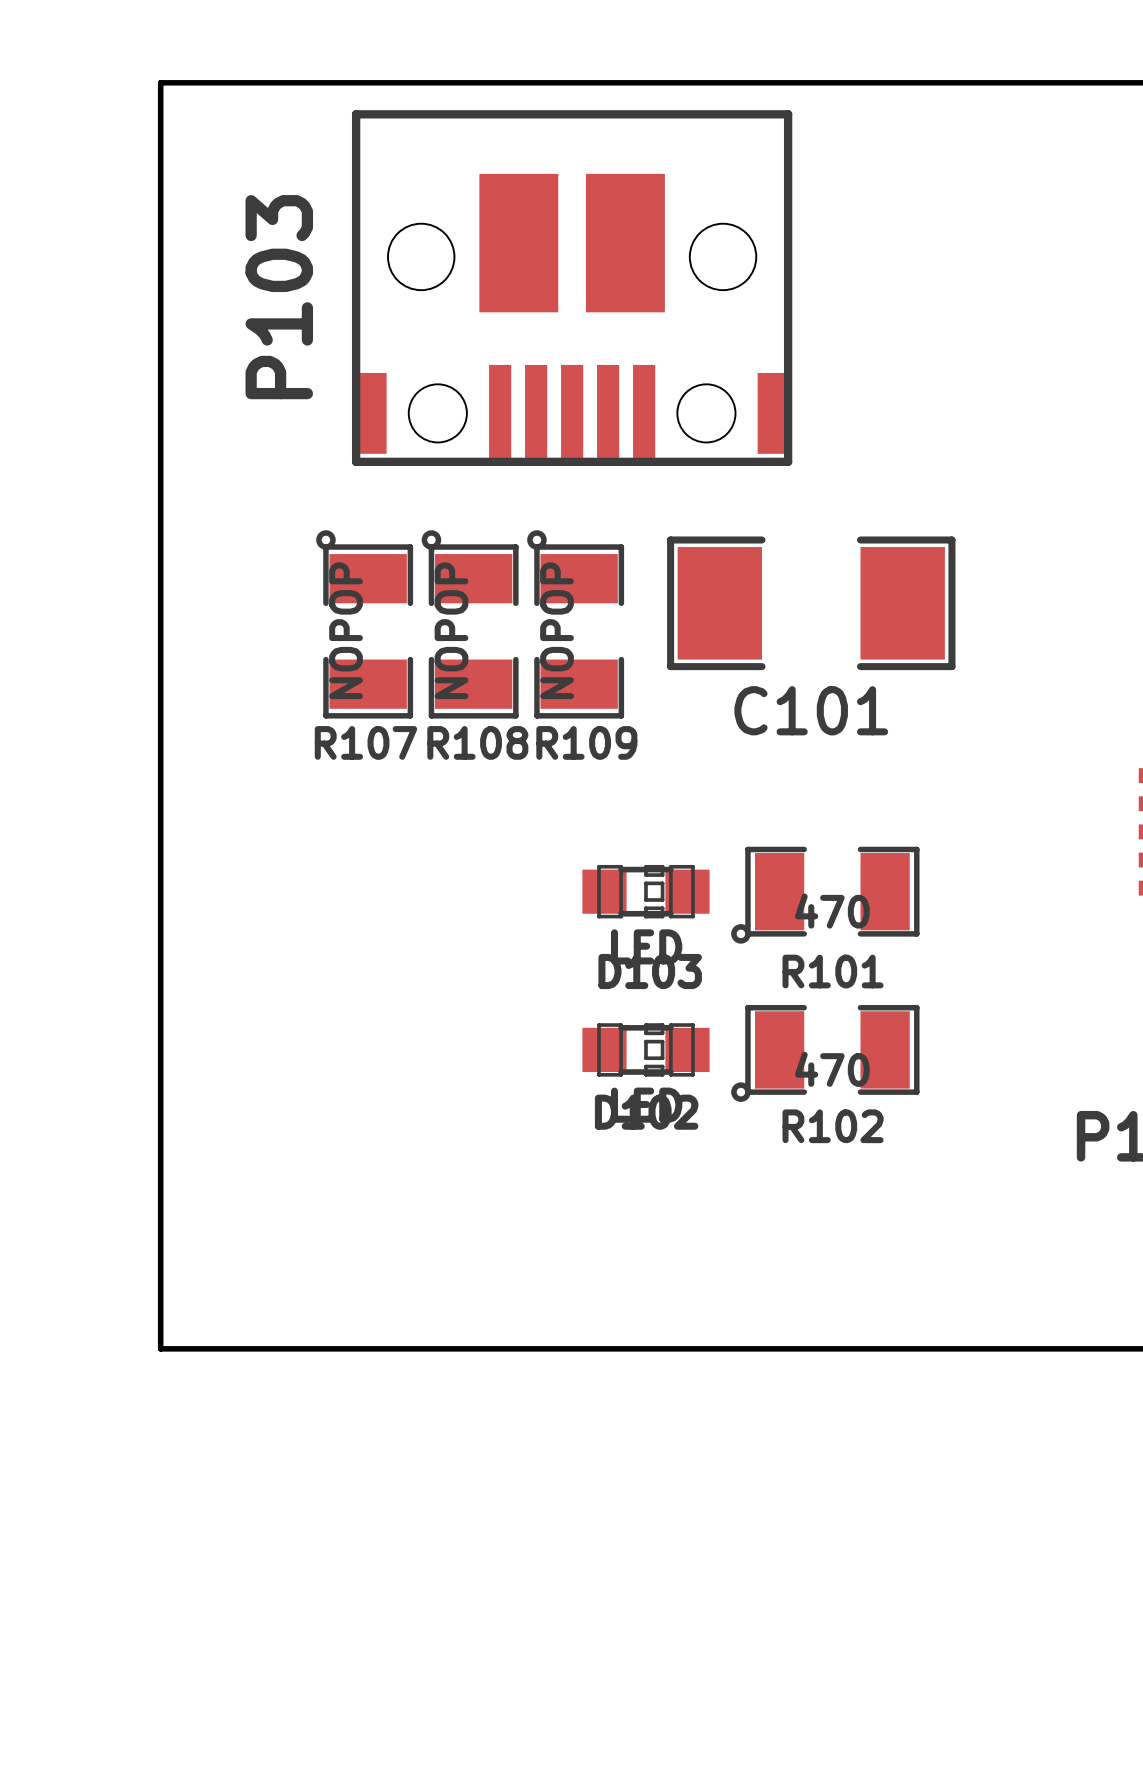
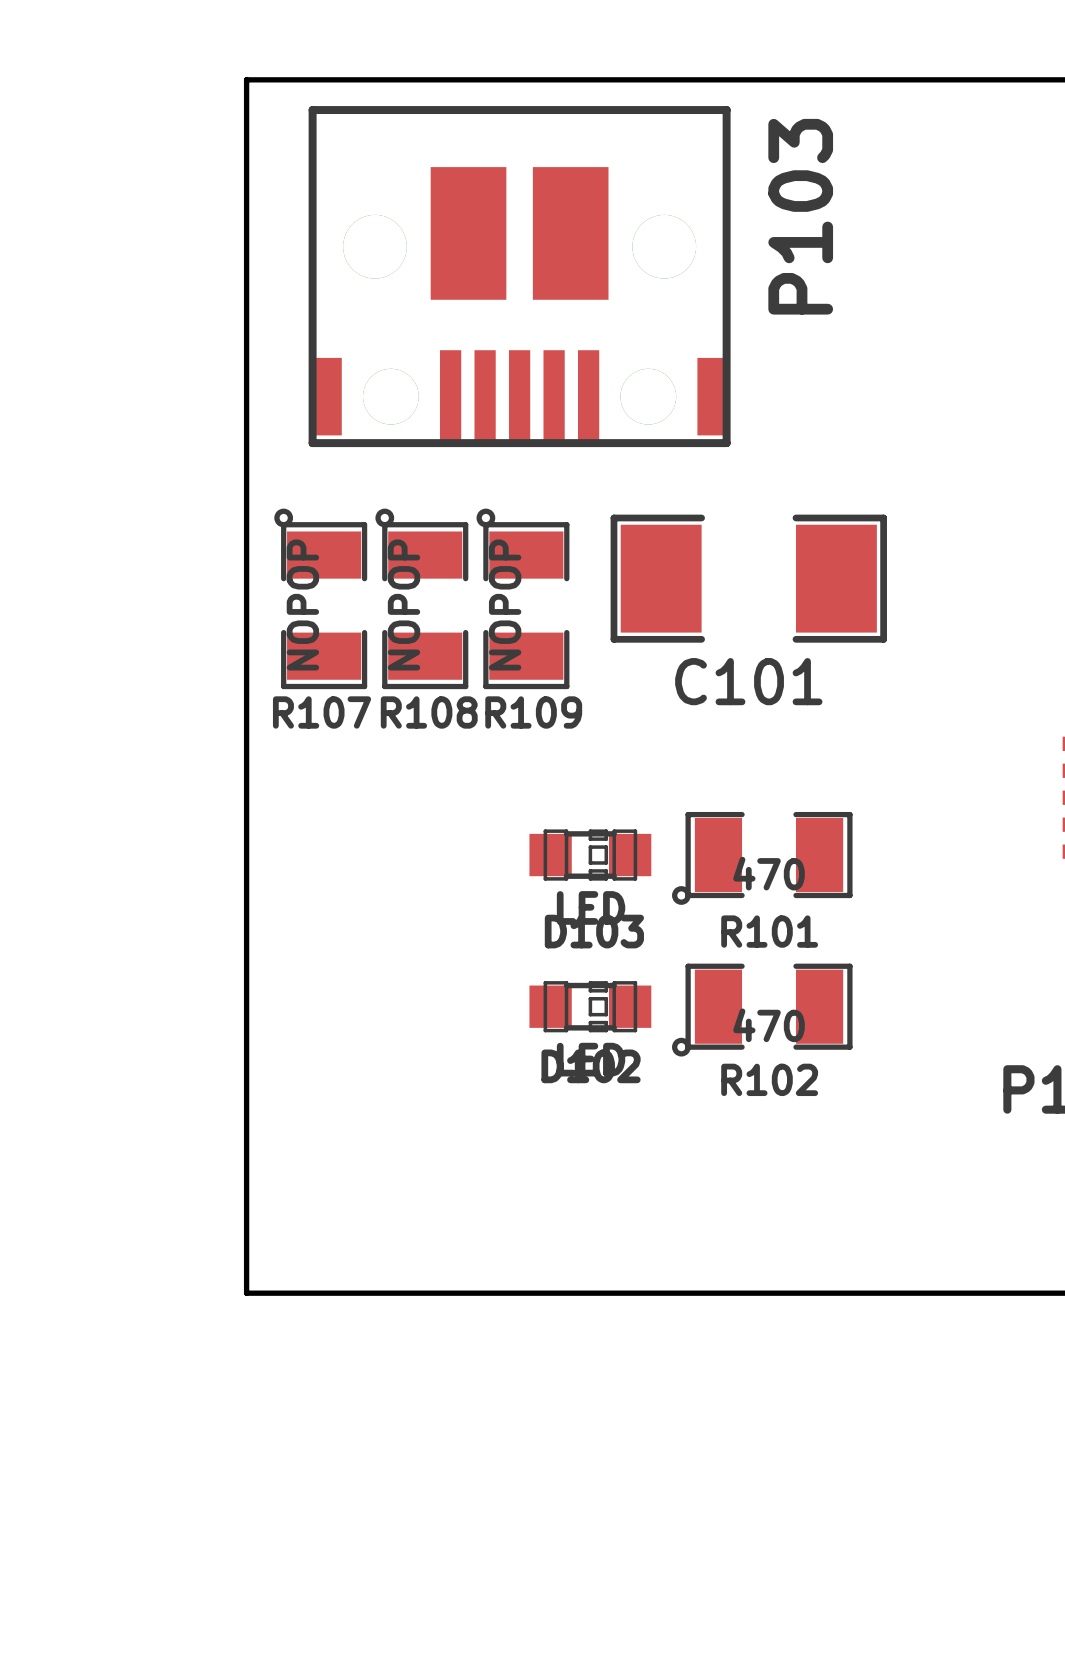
board edge: (287, 82) (160, 82) (160, 1348) (287, 1348) -> (246, 79) (246, 1293)
P103 footprint: [351, 110, 793, 467] -> [308, 106, 731, 448]
P103 name position: P103 (279, 297) -> P103 (800, 216)

